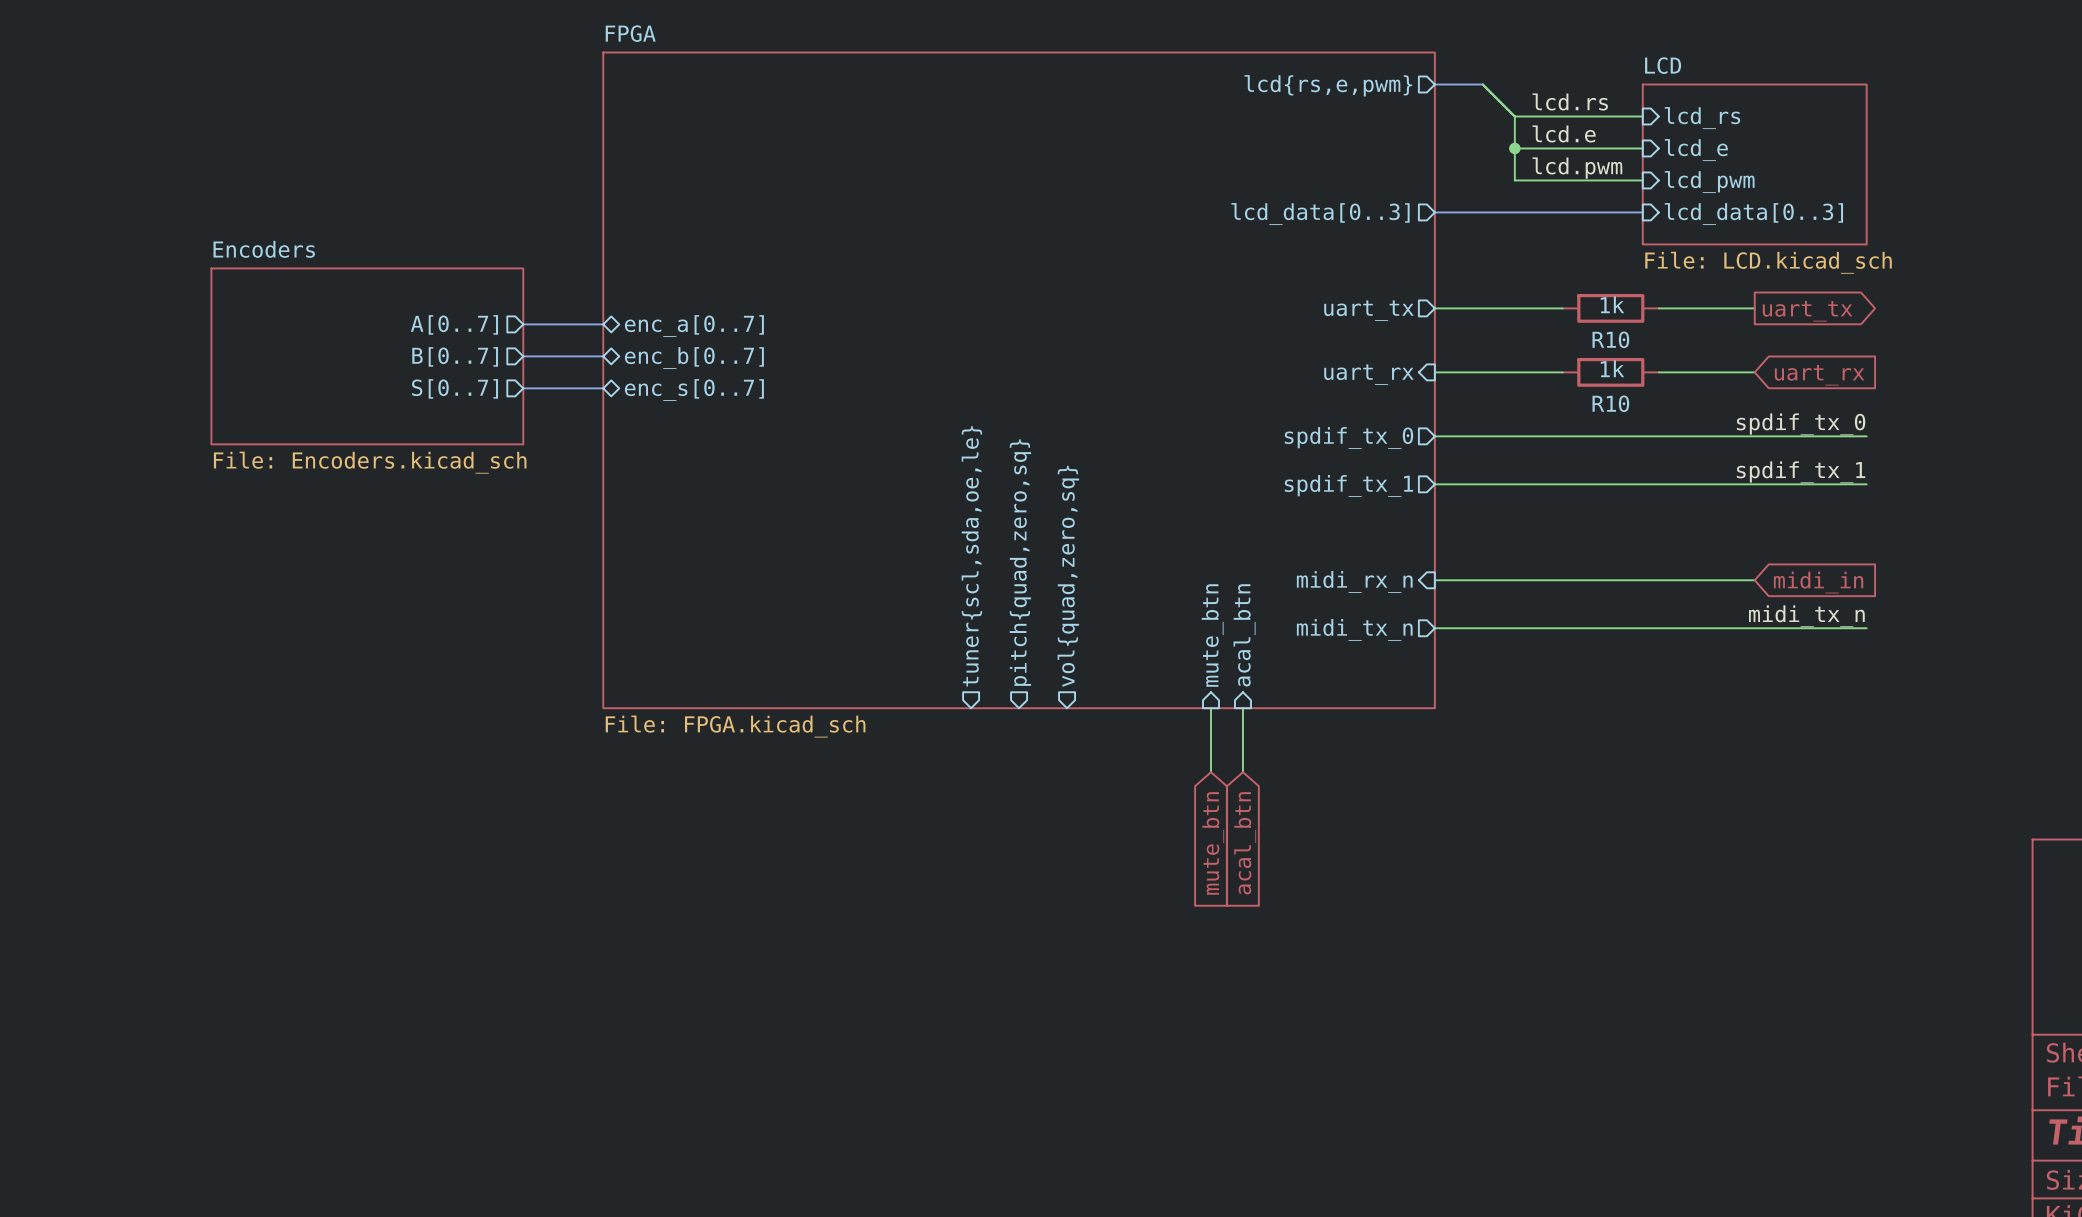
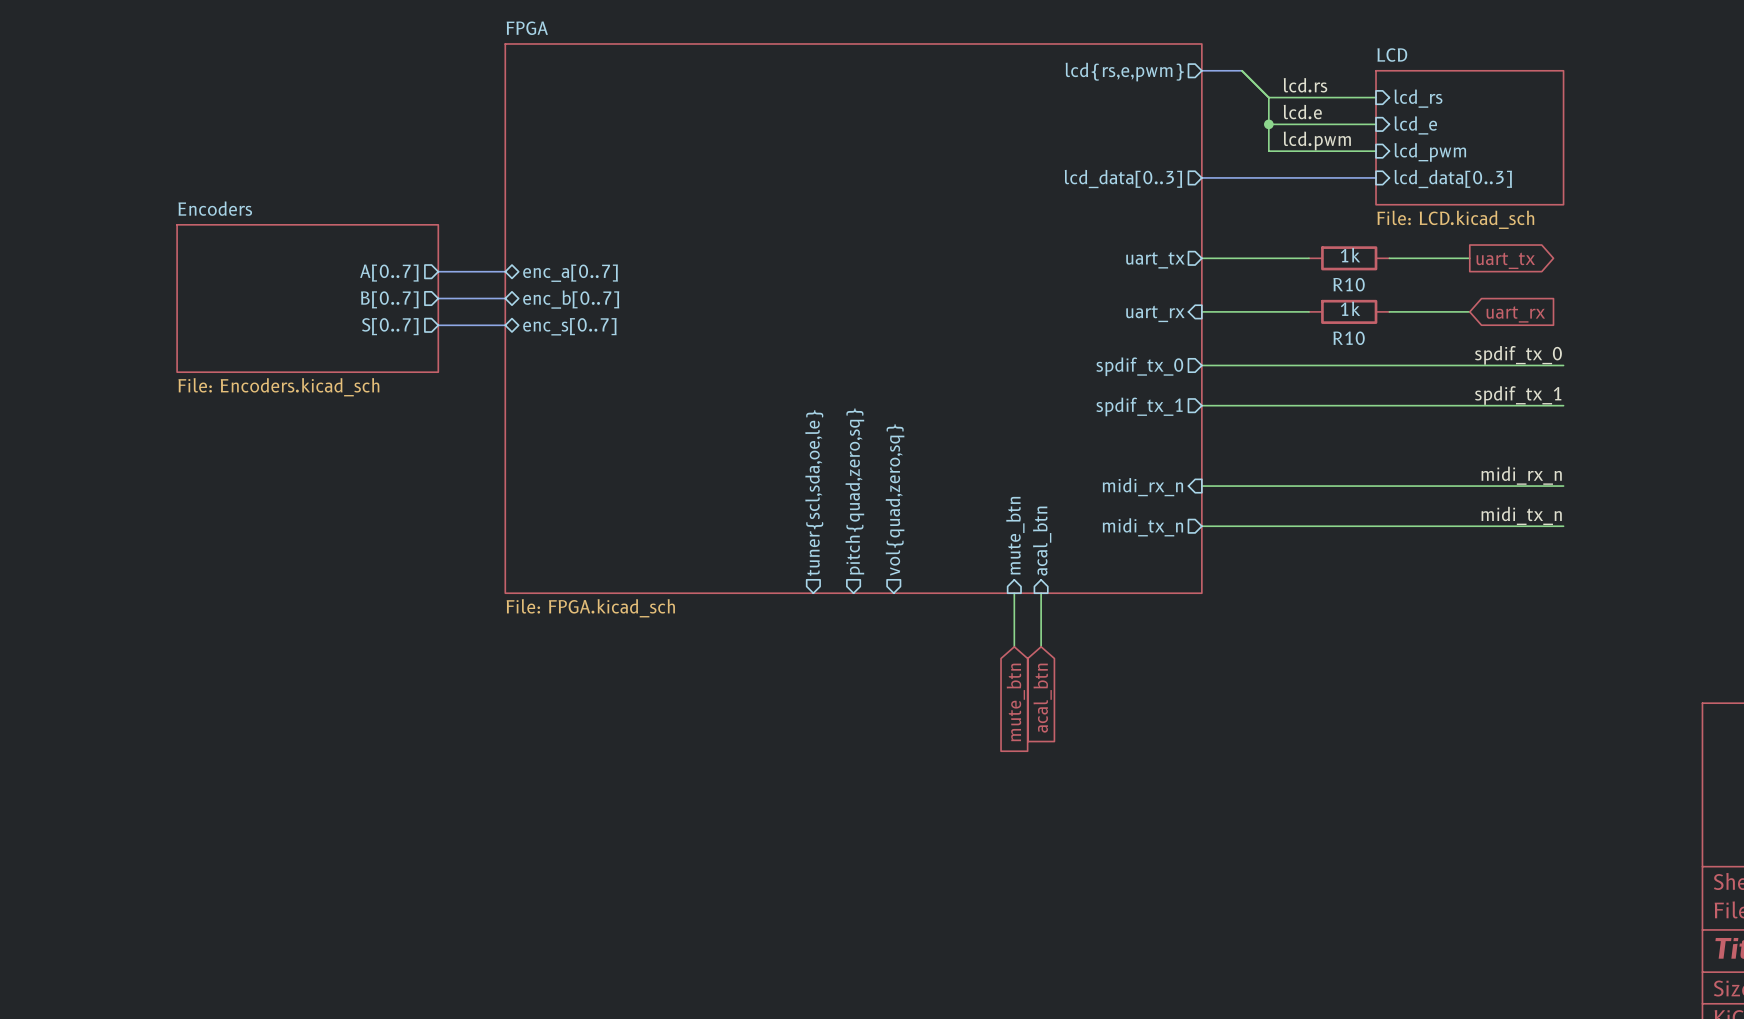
label: none -> midi_rx_n (1521, 475)
wire: none -> (1469, 486) (1563, 486)
global label: midi_in (1818, 582) -> none

